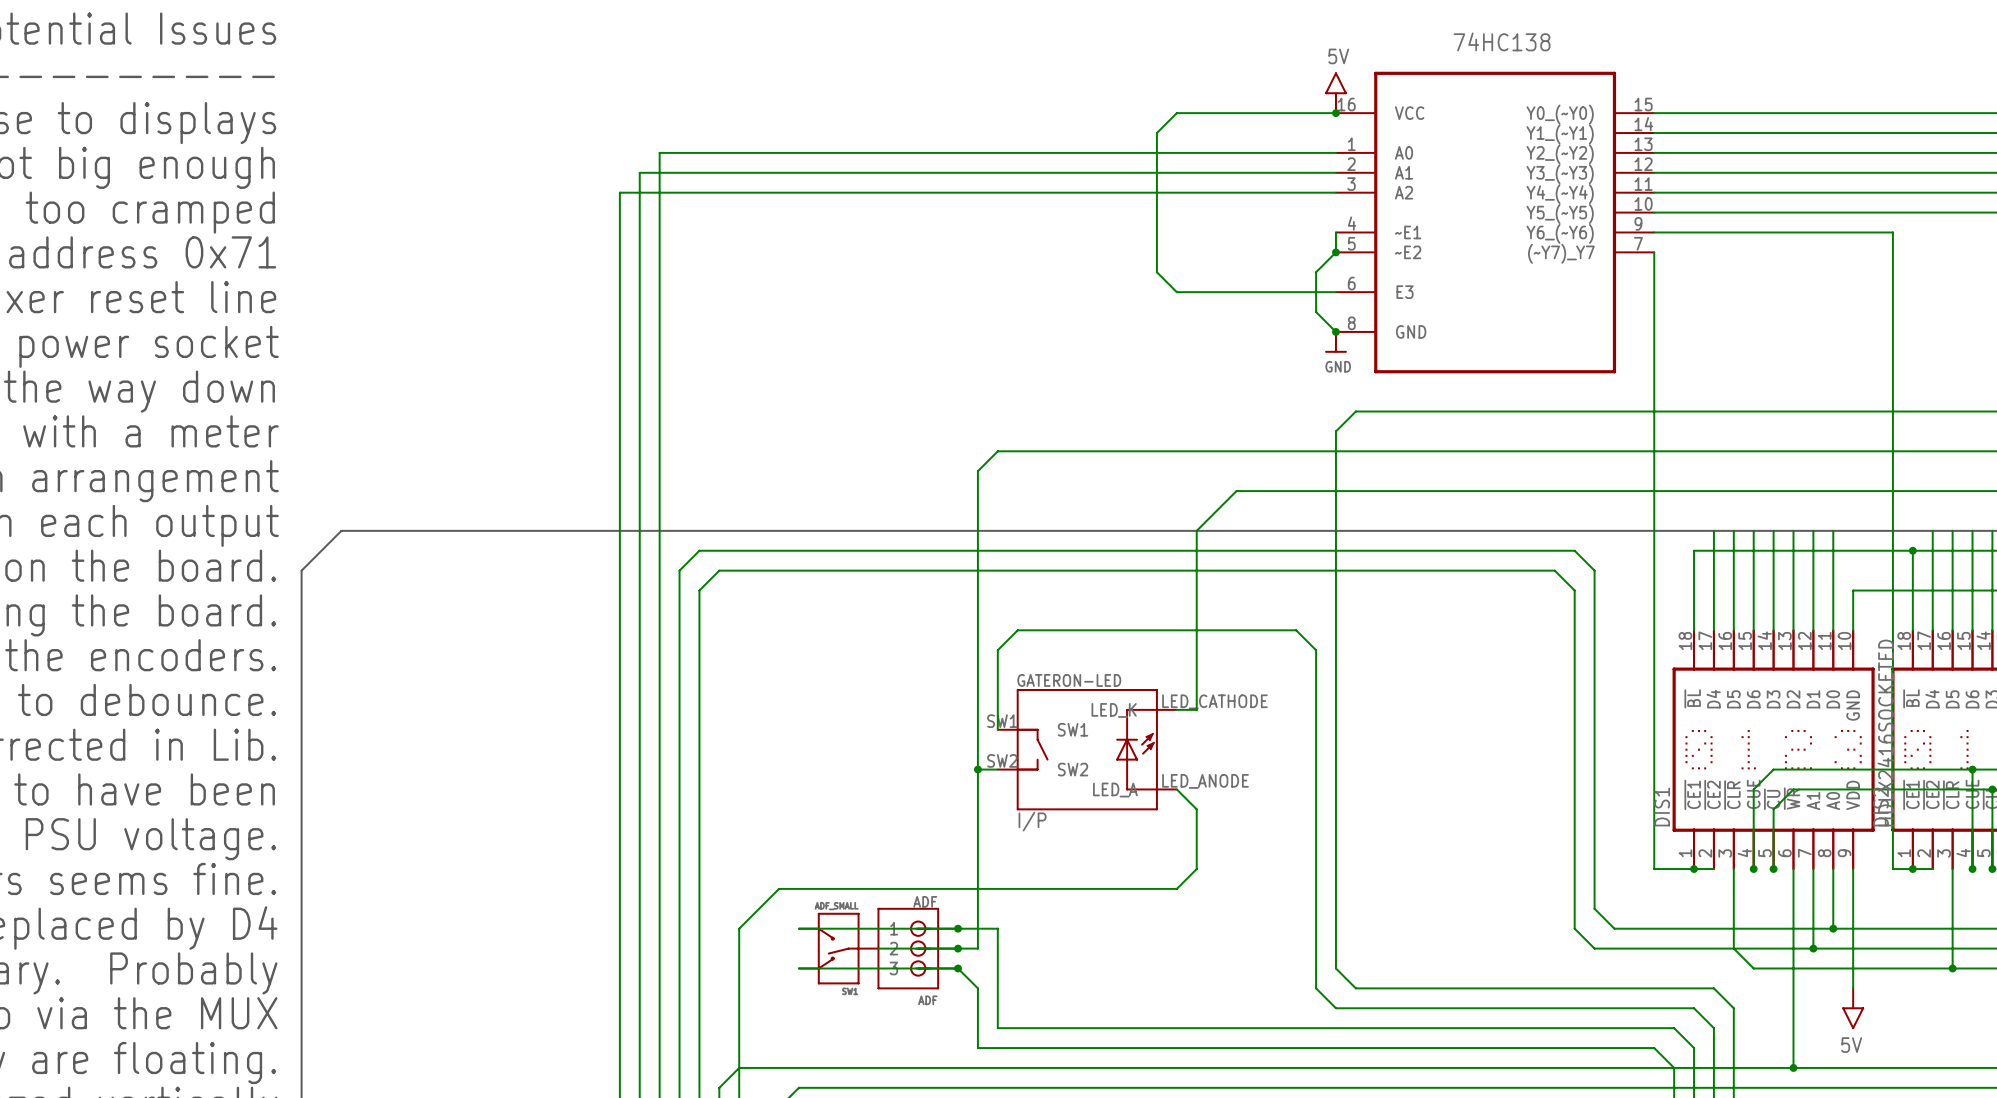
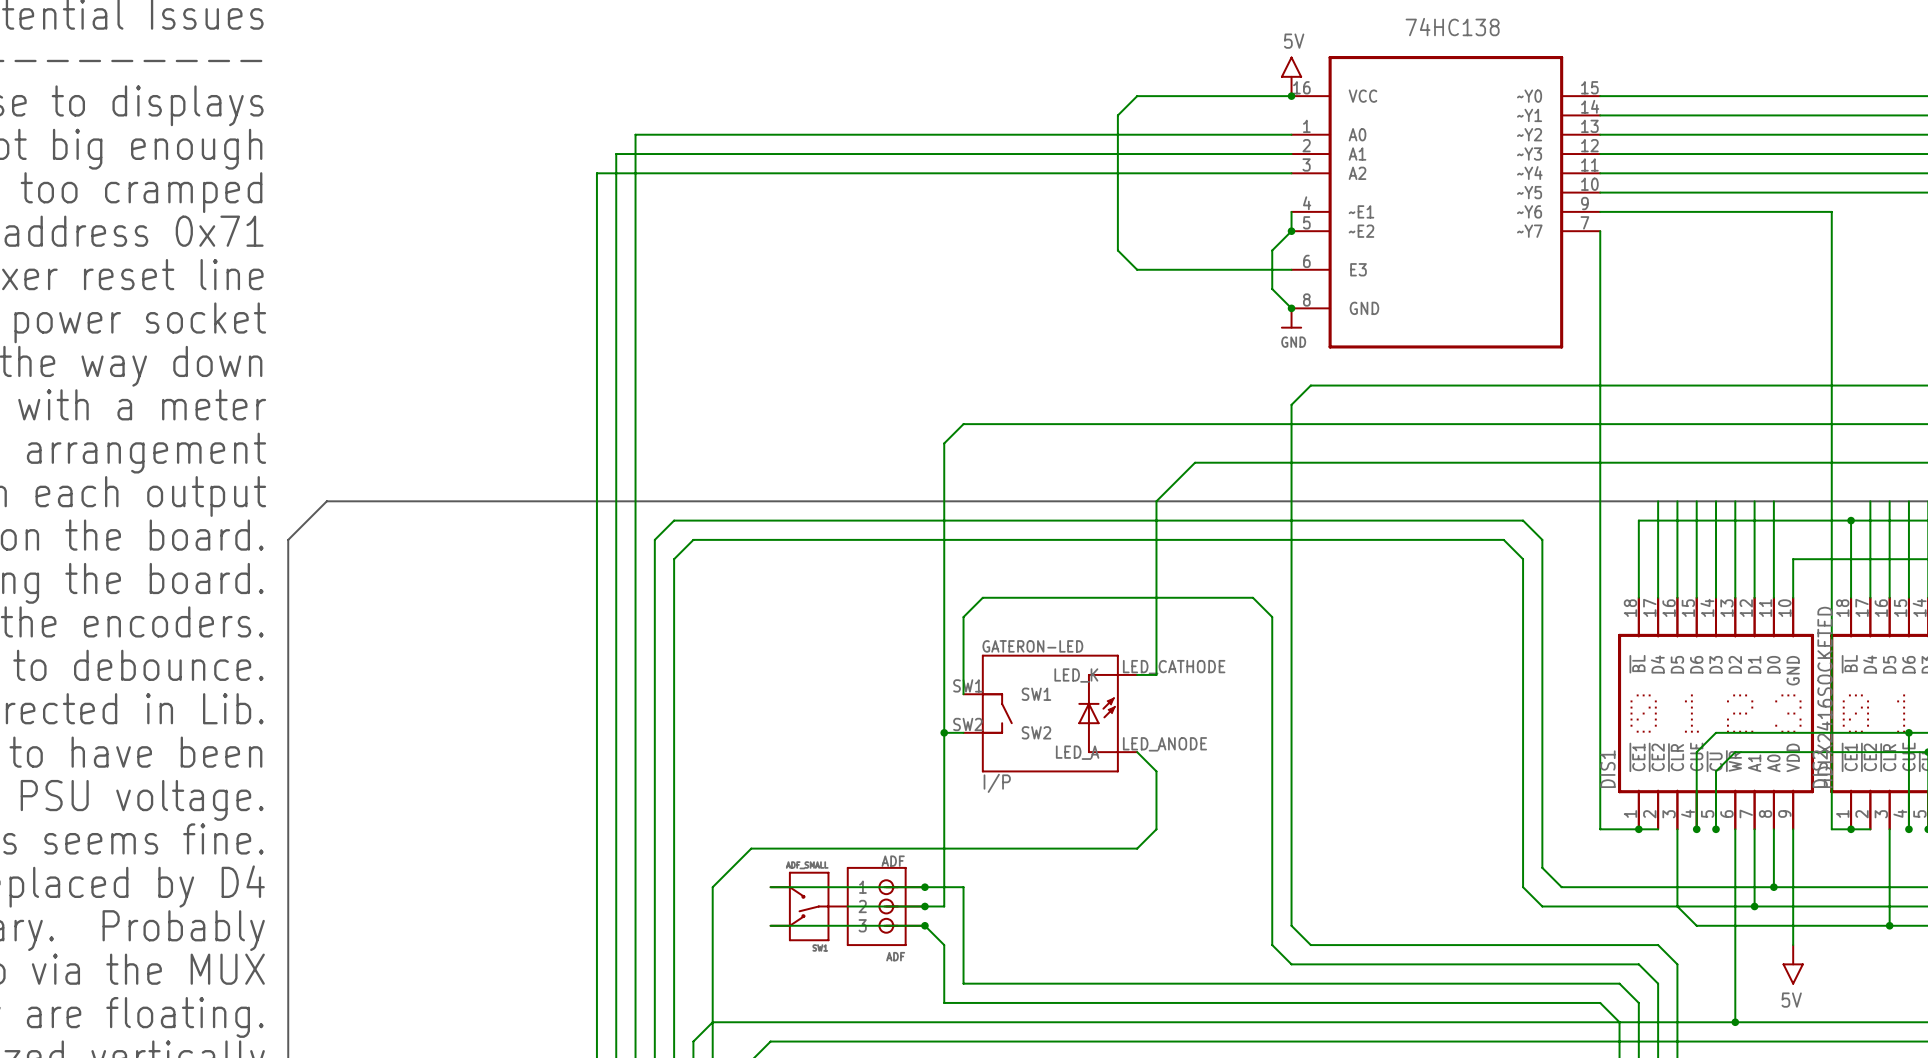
74HC138 pin name: Y0_(~Y0) (1560, 114) -> ~Y0 (1529, 96)
74HC138 pin name: Y1_(~Y1) (1560, 134) -> ~Y1 (1529, 115)
74HC138 pin name: Y2_(~Y2) (1560, 154) -> ~Y2 (1529, 134)
74HC138 pin name: Y3_(~Y3) (1560, 174) -> ~Y3 (1529, 154)
74HC138 pin name: Y4_(~Y4) (1560, 194) -> ~Y4 (1529, 173)
74HC138 pin name: Y5_(~Y5) (1560, 214) -> ~Y5 (1529, 192)
74HC138 pin name: Y6_(~Y6) (1560, 233) -> ~Y6 (1529, 211)
74HC138 pin name: (~Y7)_Y7 (1561, 253) -> ~Y7 (1529, 231)

